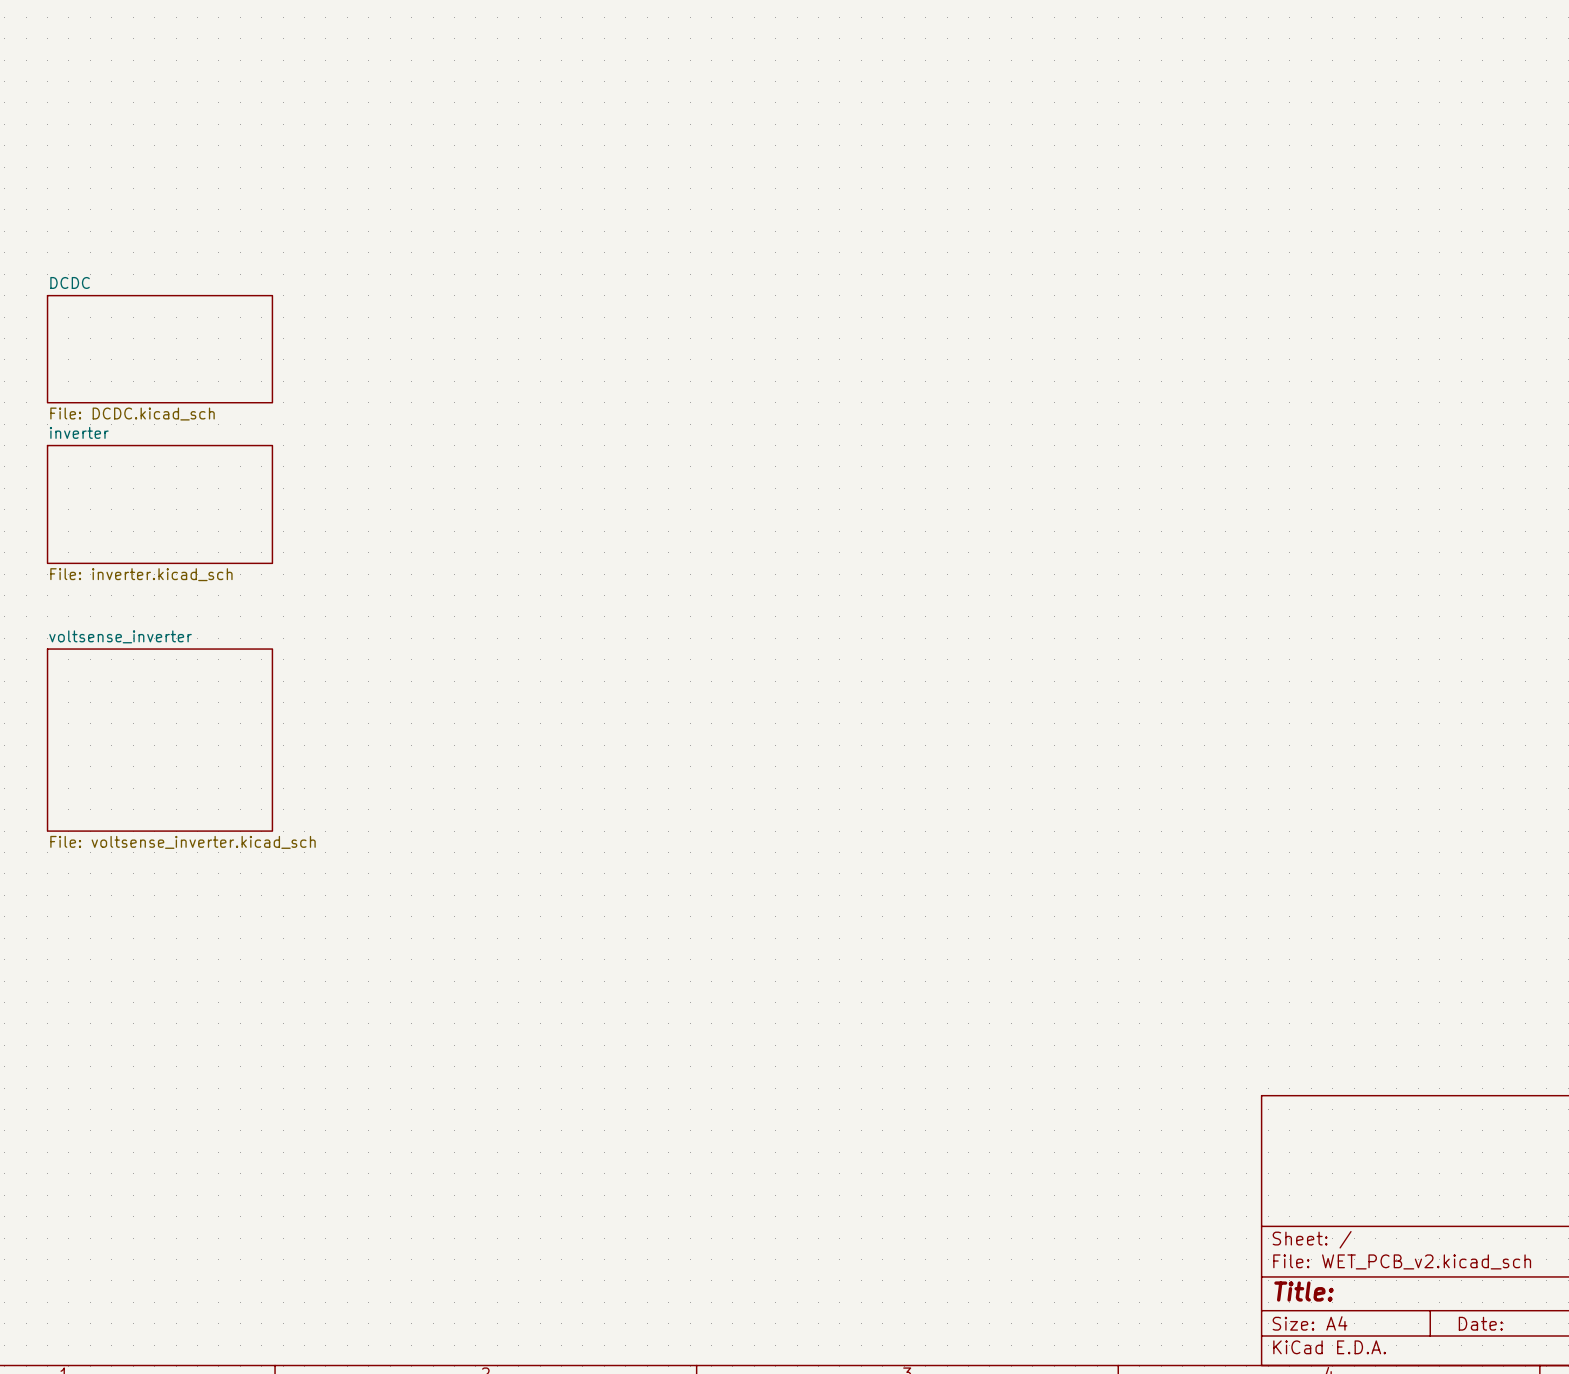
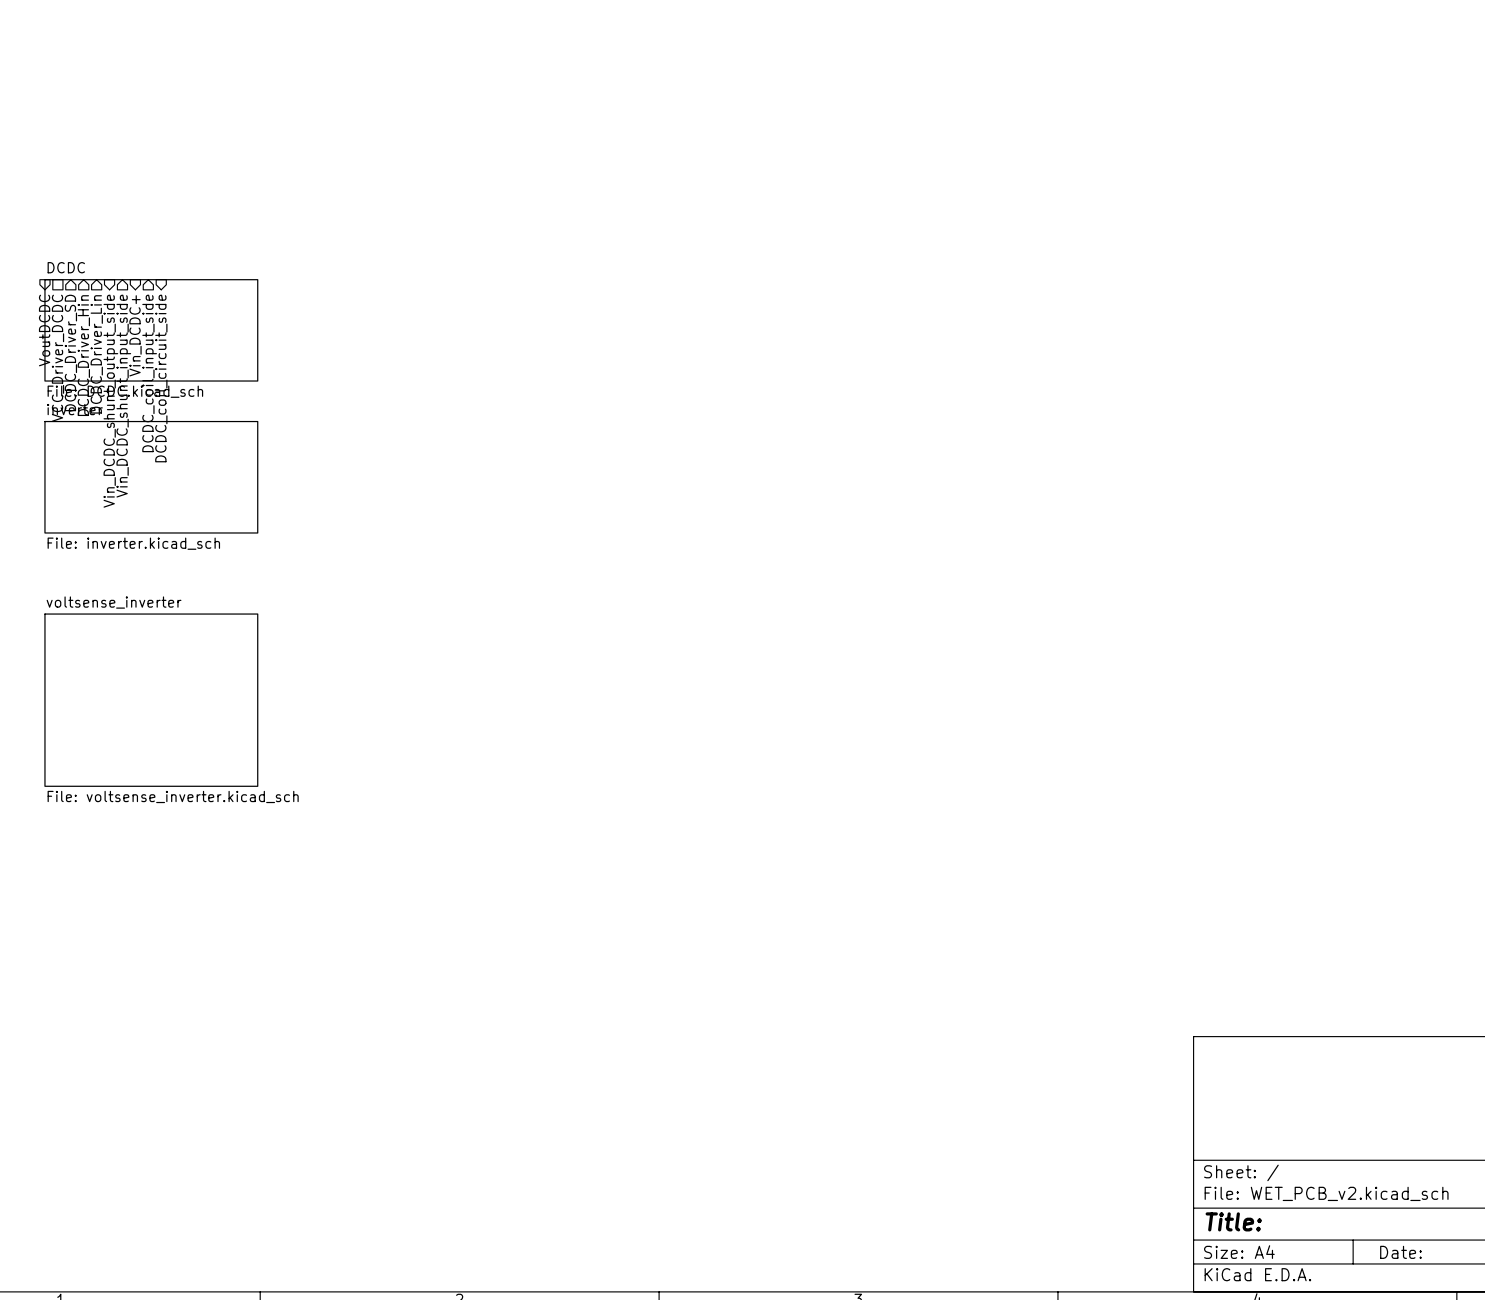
sheet pin: none -> VoutDCDC (44, 330)
sheet pin: none -> Vin_DCDC+ (135, 335)
sheet pin: none -> DCDC_Driver_SD (70, 352)
sheet pin: none -> DCDC_Driver_Lin (96, 354)
sheet pin: none -> DCDC_Driver_Hin (83, 355)
sheet pin: none -> VCC_Driver_DCDC (57, 358)
sheet pin: none -> DCDC_coil_input_side (149, 373)
sheet pin: none -> DCDC_coil_circuit_side (161, 378)
sheet pin: none -> Vin_DCDC_shunt_input_side (123, 396)
sheet pin: none -> Vin_DCDC_shunt_output_side (110, 401)

